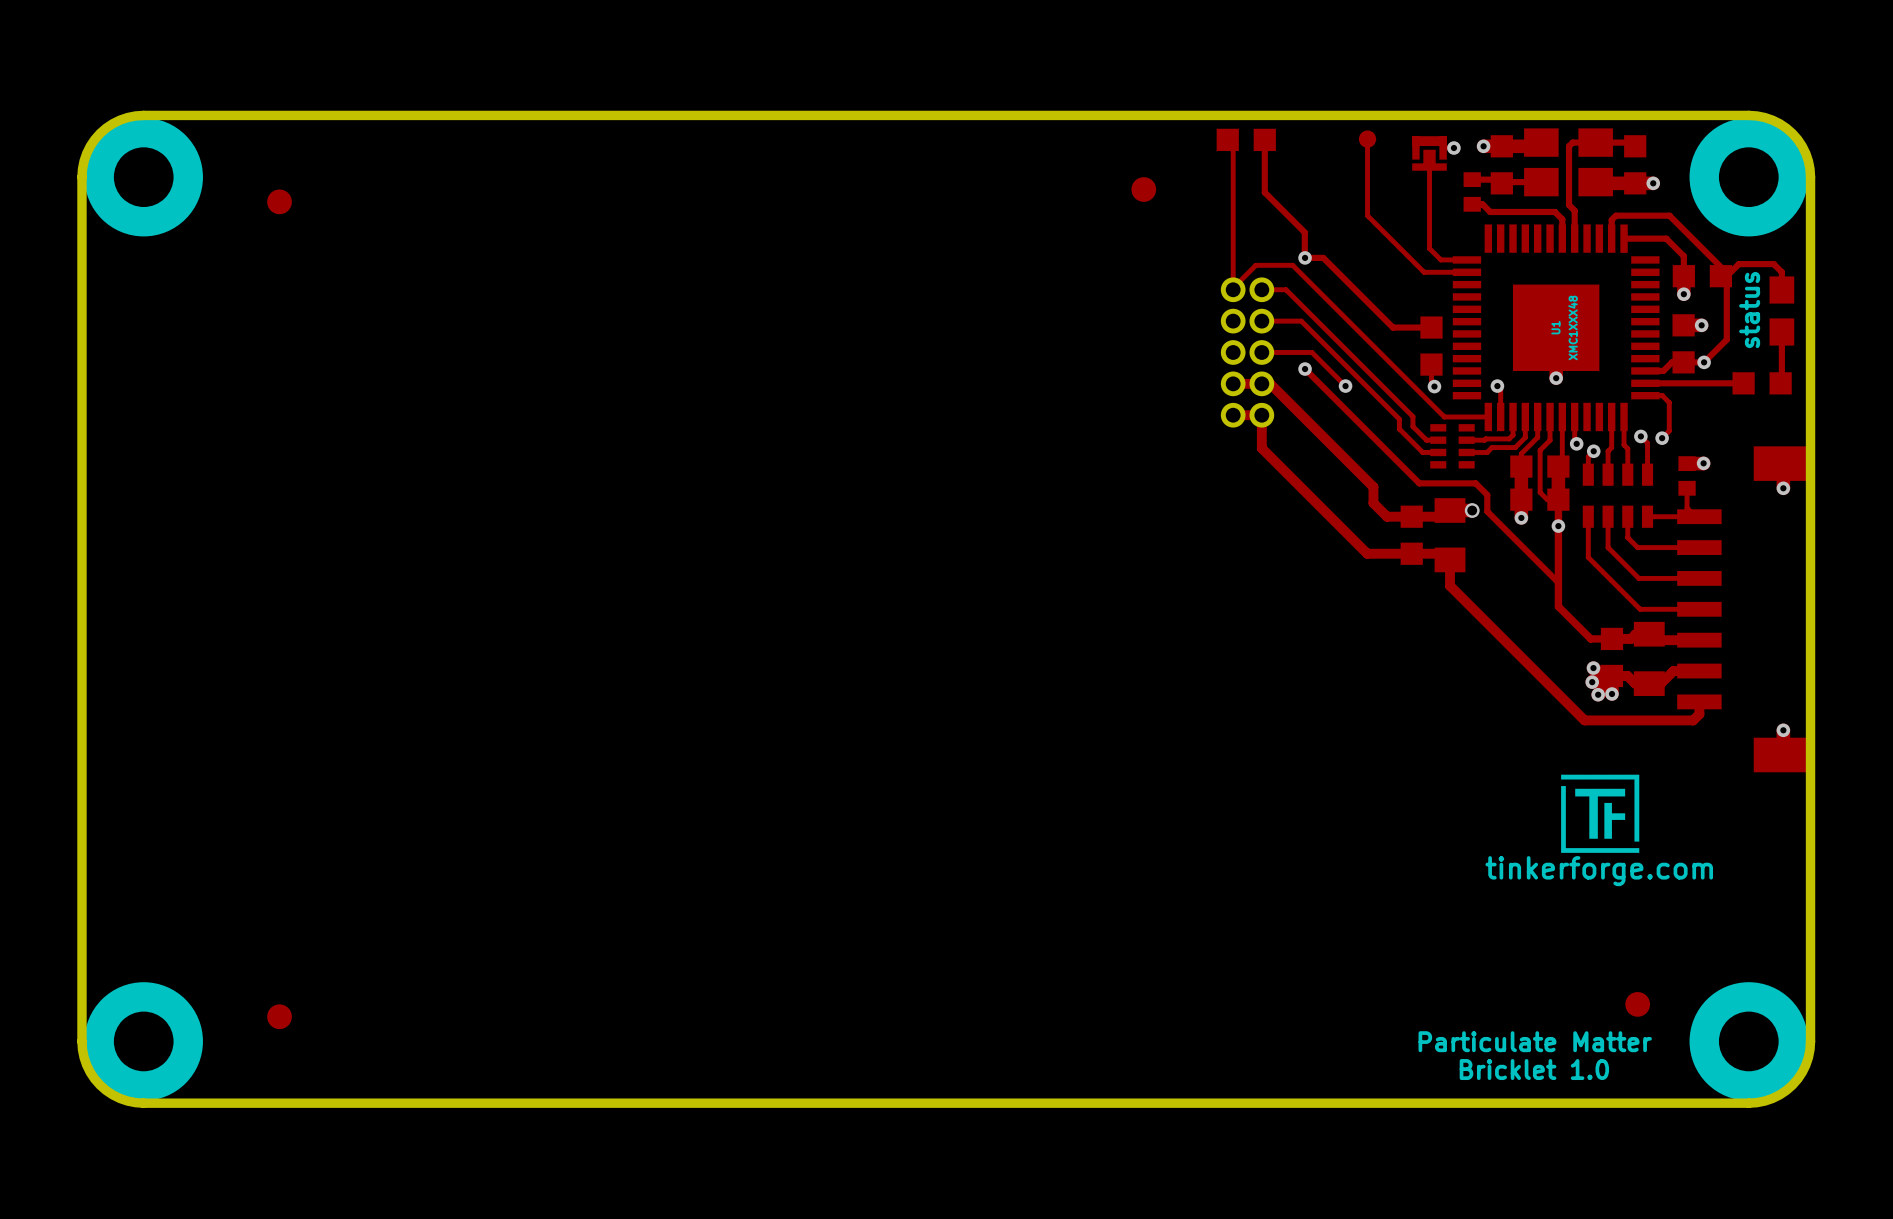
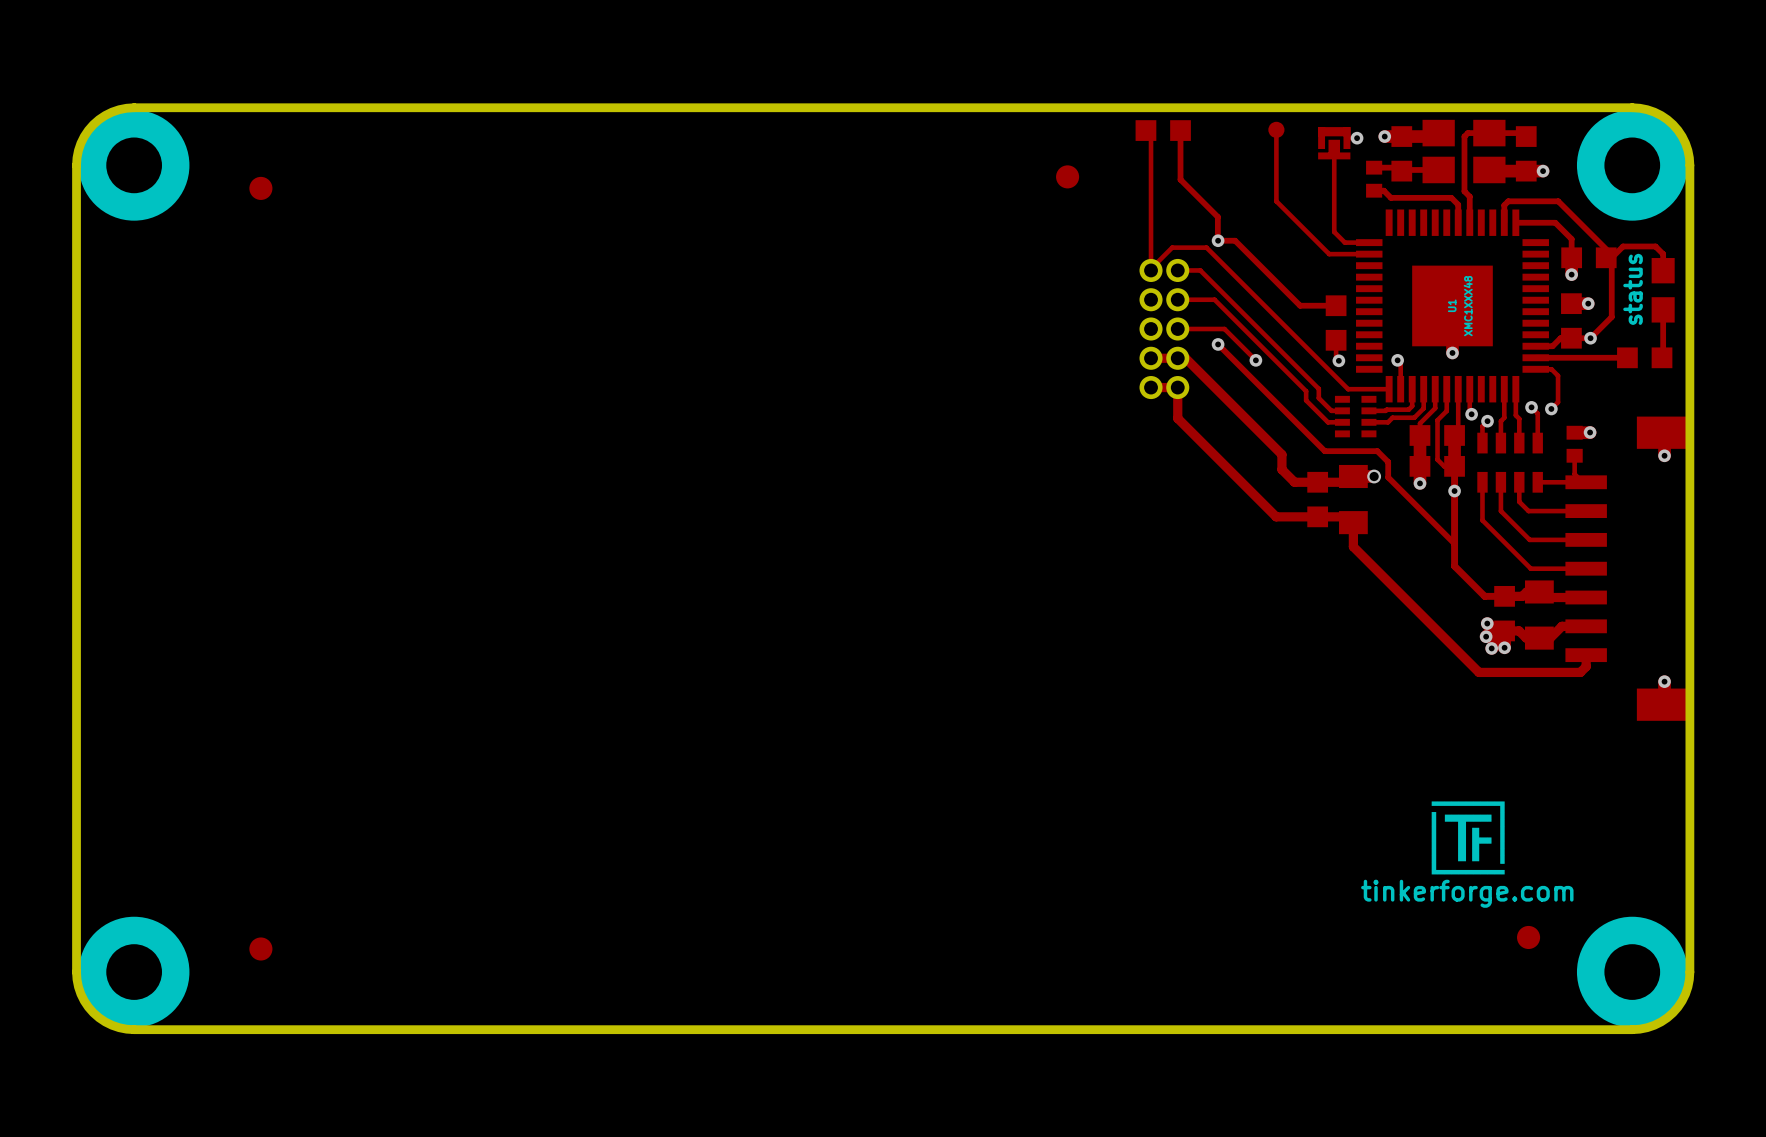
drawing position: (1600, 813) -> (1468, 837)
text position: tinkerforge.com (1599, 871) -> tinkerforge.com (1467, 893)
text: Particulate Matter (1535, 1041) -> none
text: Bricklet 1.0 (1534, 1069) -> none

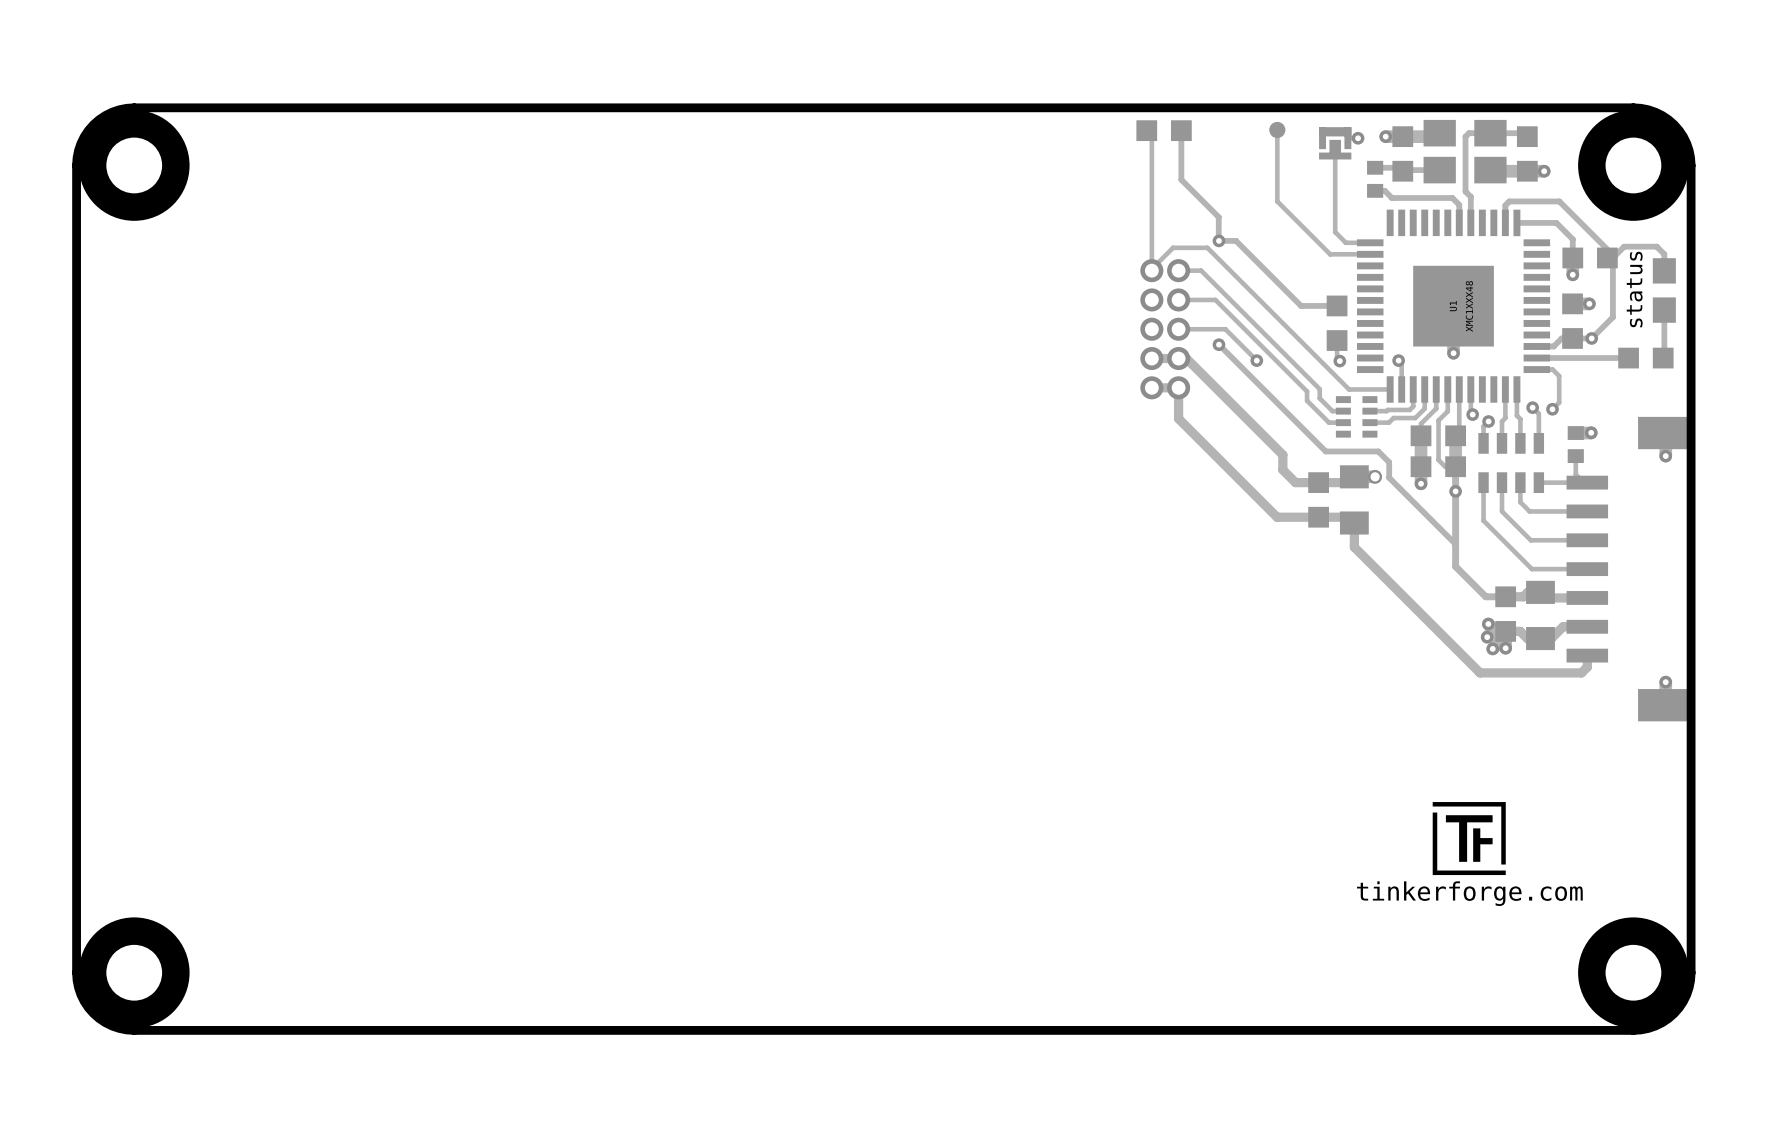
part: (1067, 176) -> none
part: (260, 188) -> none
part: (1528, 937) -> none
part: (260, 949) -> none

